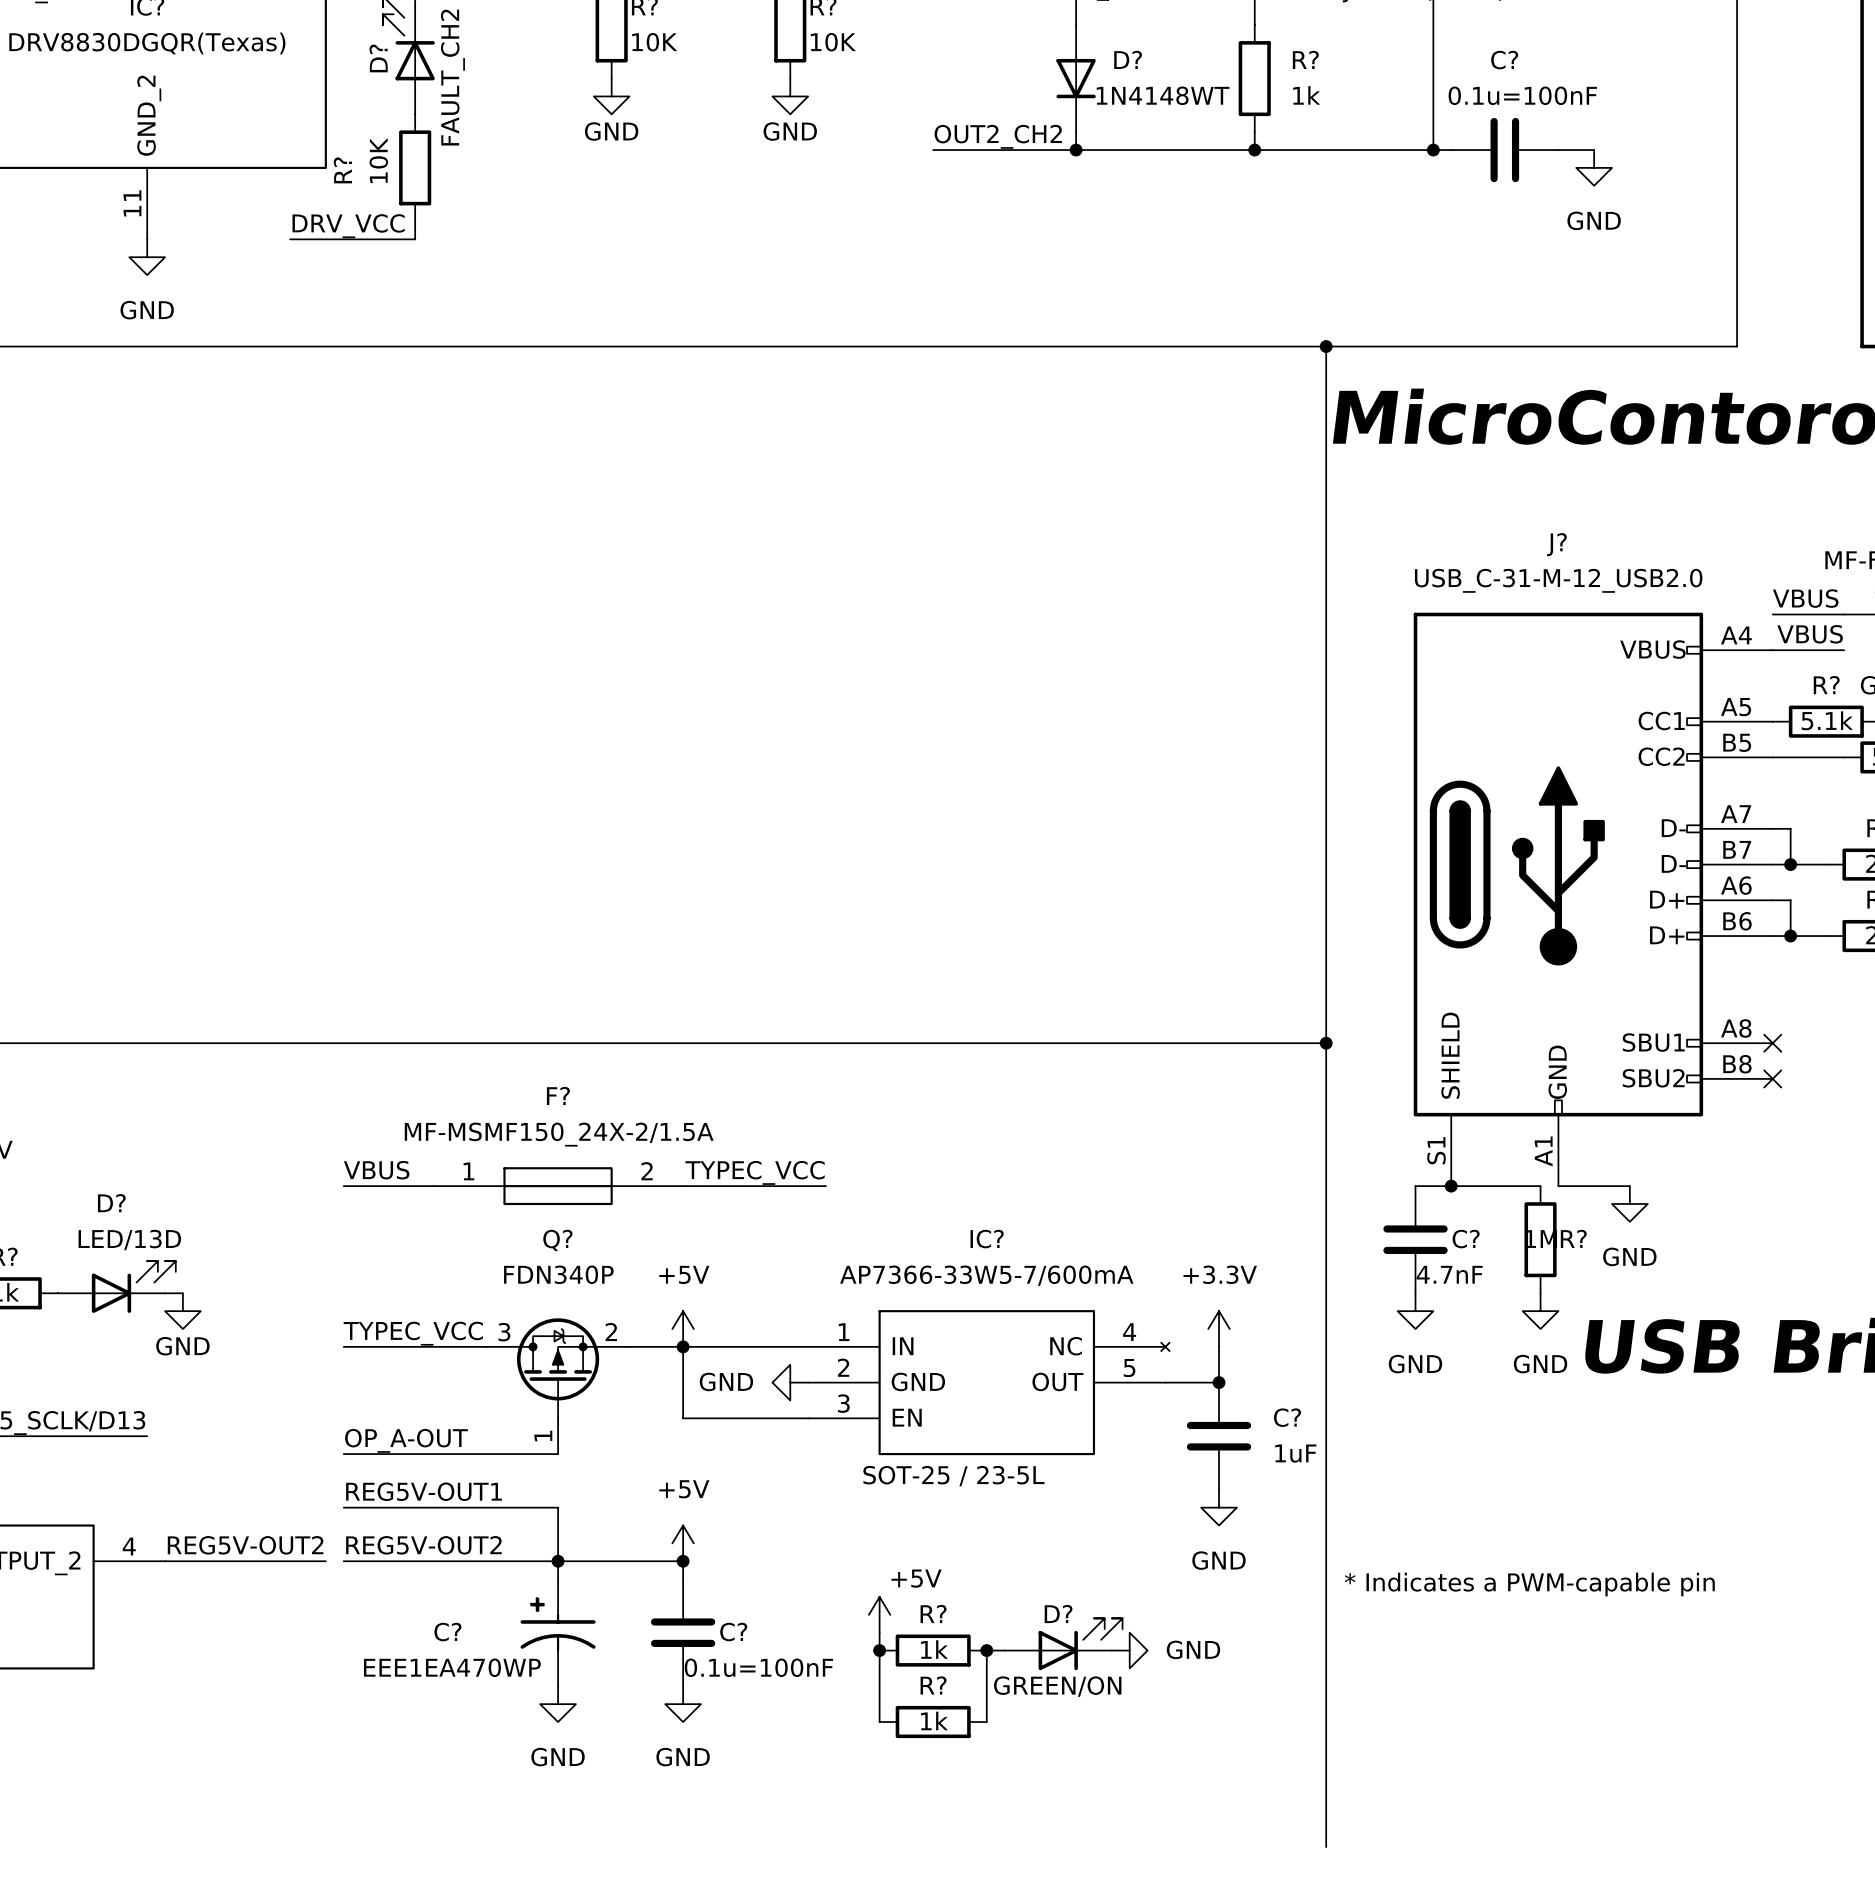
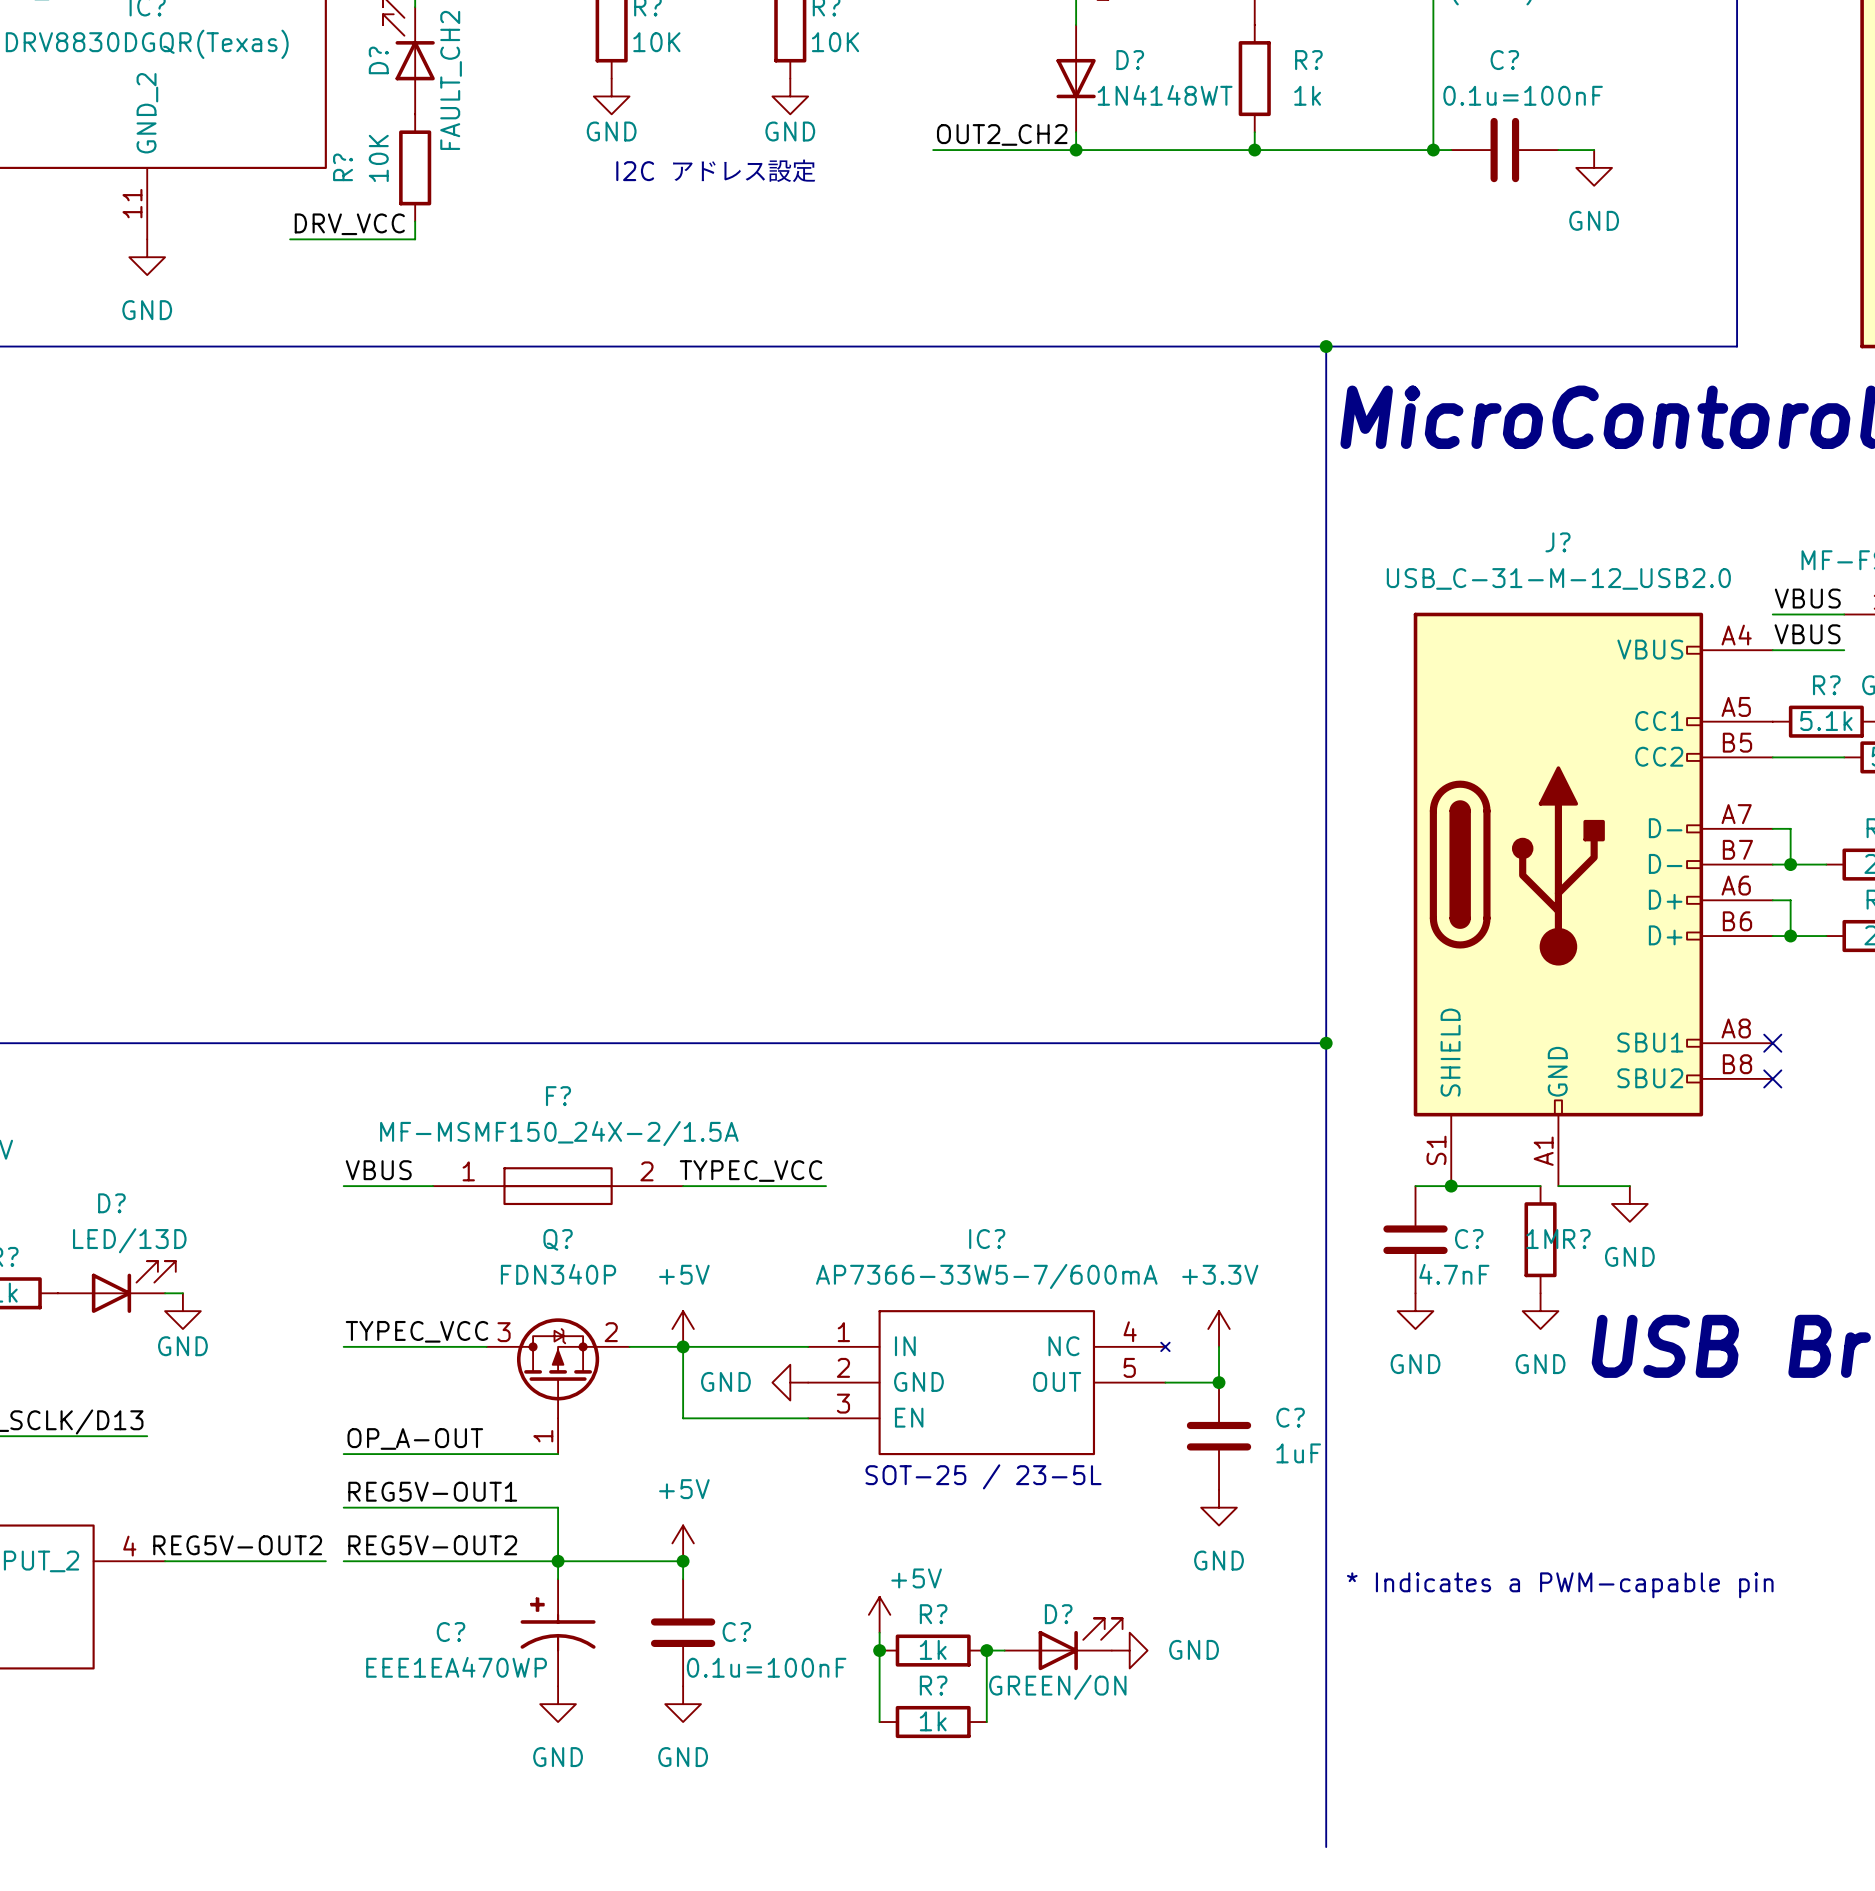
text: none -> I2C アドレス設定 (716, 170)

